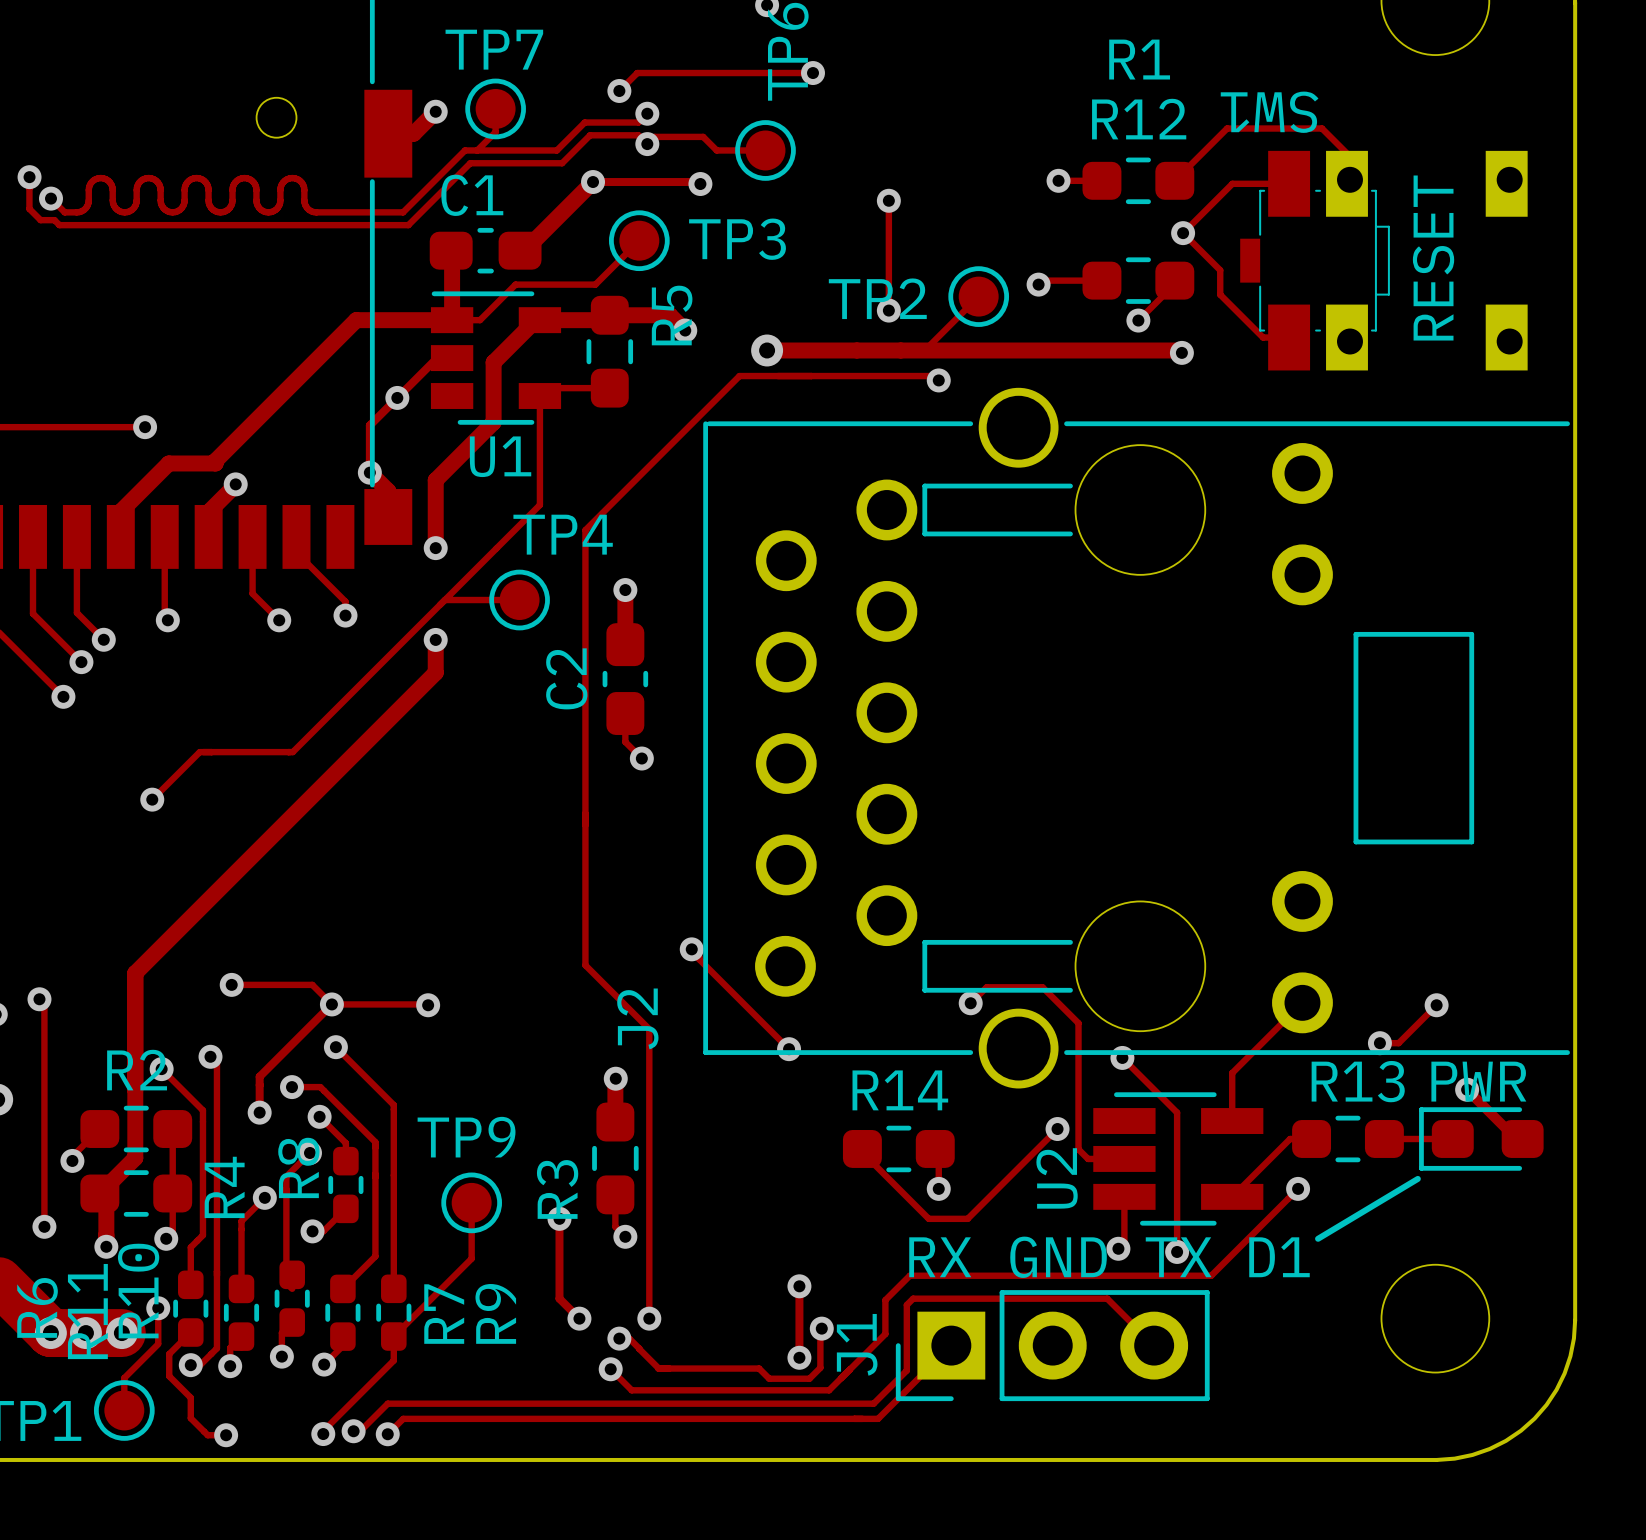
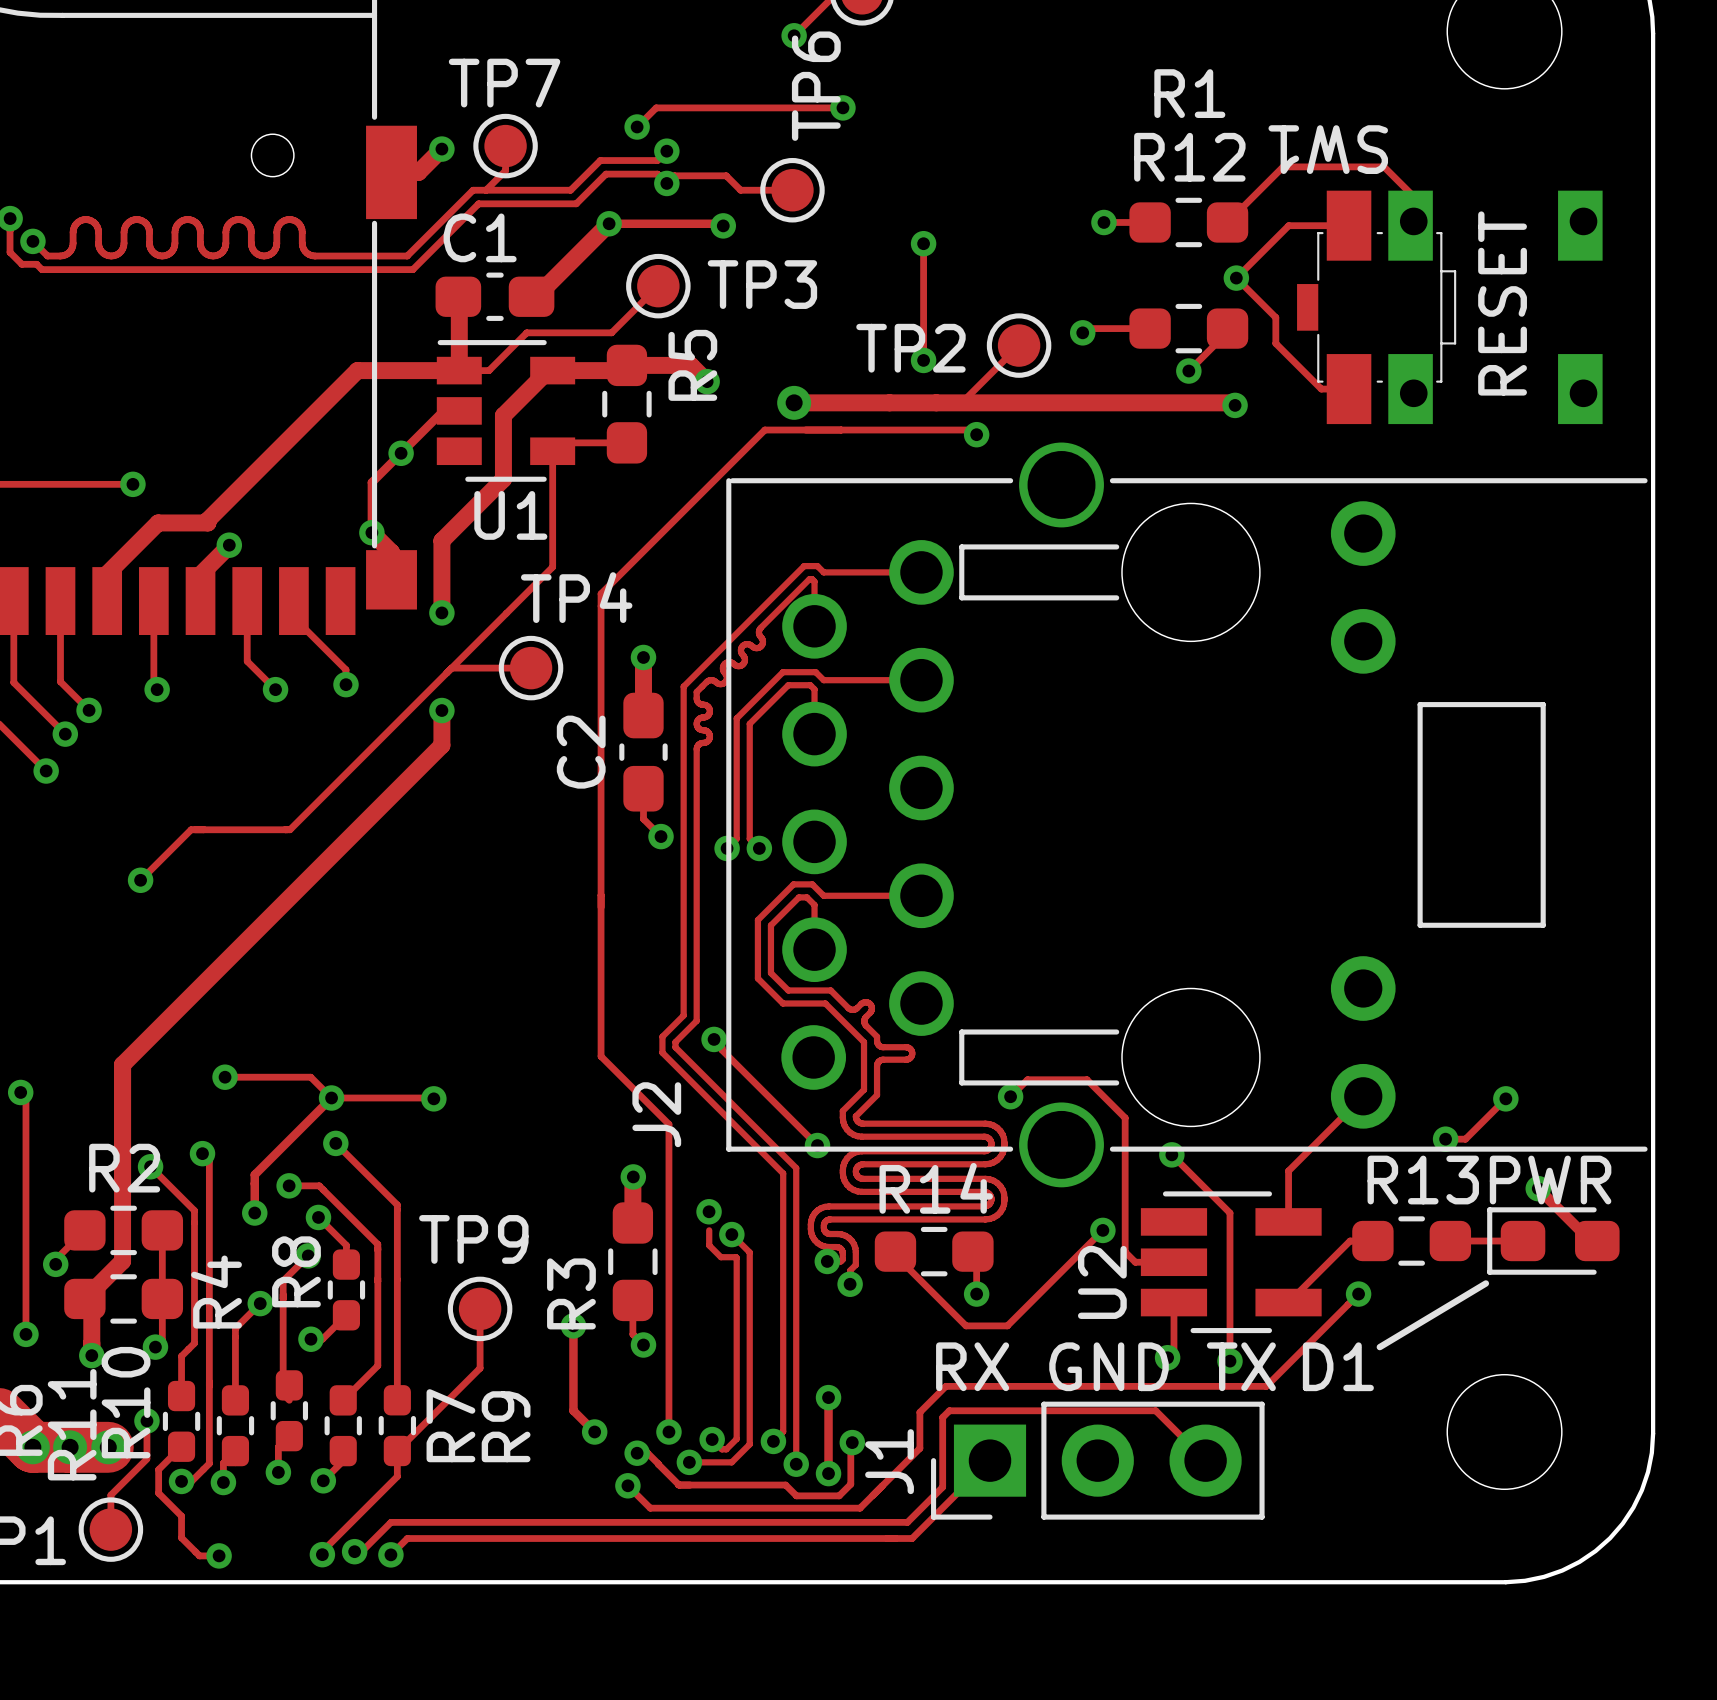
track: none -> (921, 572) (823, 572) (817, 566) (804, 566) (683, 686) (683, 1015) (662, 1036) (662, 1052) (783, 1173) (783, 1431) (773, 1441)
track: none -> (814, 626) (814, 581) (809, 579) (760, 627) (758, 633) (760, 636)
track: none -> (761, 637) (762, 641) (761, 646) (757, 648) (752, 646)
track: none -> (751, 645) (747, 644) (742, 645) (740, 651) (742, 654)
track: none -> (743, 655) (744, 659) (743, 664) (739, 666) (734, 664)
track: none -> (733, 663) (729, 662) (724, 663) (722, 669) (724, 672)
track: none -> (725, 673) (726, 677) (725, 682) (721, 684) (716, 682)
track: none -> (921, 680) (823, 680) (815, 672) (782, 672) (736, 718) (736, 838) (727, 848)
track: none -> (715, 681) (707, 681) (696, 692) (697, 701) (703, 704)
track: none -> (703, 704) (708, 707) (709, 711) (708, 715) (703, 717)
track: none -> (703, 717) (697, 721) (697, 726) (707, 731) (709, 736) (707, 741) (703, 742)
track: none -> (814, 734) (814, 689) (810, 685) (788, 685) (749, 723) (749, 838) (759, 848)
track: none -> (703, 742) (698, 745) (696, 749) (696, 1020) (675, 1042) (675, 1047) (796, 1168) (796, 1464)
via: none -> (727, 848)
via: none -> (759, 848)
track: none -> (921, 895) (823, 895) (812, 884) (793, 884) (757, 920) (757, 978) (782, 1003) (825, 1003) (864, 1042) (864, 1089) (842, 1111) (843, 1121) (850, 1132) (861, 1136) (984, 1136) (988, 1138) (991, 1142) (989, 1148) (984, 1151) (861, 1151) (850, 1155) (843, 1166) (843, 1177) (846, 1184) (857, 1191) (984, 1191) (989, 1194) (991, 1200) (988, 1204) (984, 1206) (828, 1206) (821, 1208) (814, 1213) (811, 1220) (812, 1236) (821, 1245) (837, 1247) (842, 1251) (842, 1259) (840, 1261) (827, 1261)
track: none -> (814, 949) (814, 904) (806, 897) (798, 897) (770, 925) (770, 973) (788, 990) (830, 990) (852, 1009) (863, 1002) (869, 1003) (871, 1010) (864, 1022) (877, 1036) (878, 1044) (883, 1047) (907, 1047) (912, 1052) (910, 1057) (907, 1059) (883, 1059) (878, 1062) (877, 1095) (855, 1116) (857, 1120) (863, 1123) (989, 1124) (1000, 1130) (1004, 1142) (1000, 1157) (989, 1163) (863, 1164) (858, 1165) (856, 1173) (858, 1177) (863, 1178) (989, 1179) (1000, 1186) (1004, 1200) (1000, 1212) (993, 1217) (985, 1219) (827, 1220) (823, 1225) (826, 1232) (845, 1235) (854, 1244) (855, 1264) (850, 1270) (850, 1284)
via: none -> (709, 1211)
track: none -> (709, 1230) (709, 1245) (720, 1257) (736, 1257) (736, 1438) (726, 1449) (721, 1449) (712, 1439)
track: none -> (731, 1234) (749, 1252) (749, 1444) (731, 1462) (689, 1462)
via: none -> (731, 1234)
via: none -> (827, 1261)
via: none -> (850, 1284)
via: none -> (712, 1439)
via: none -> (773, 1441)
via: none -> (689, 1462)
via: none -> (796, 1464)

